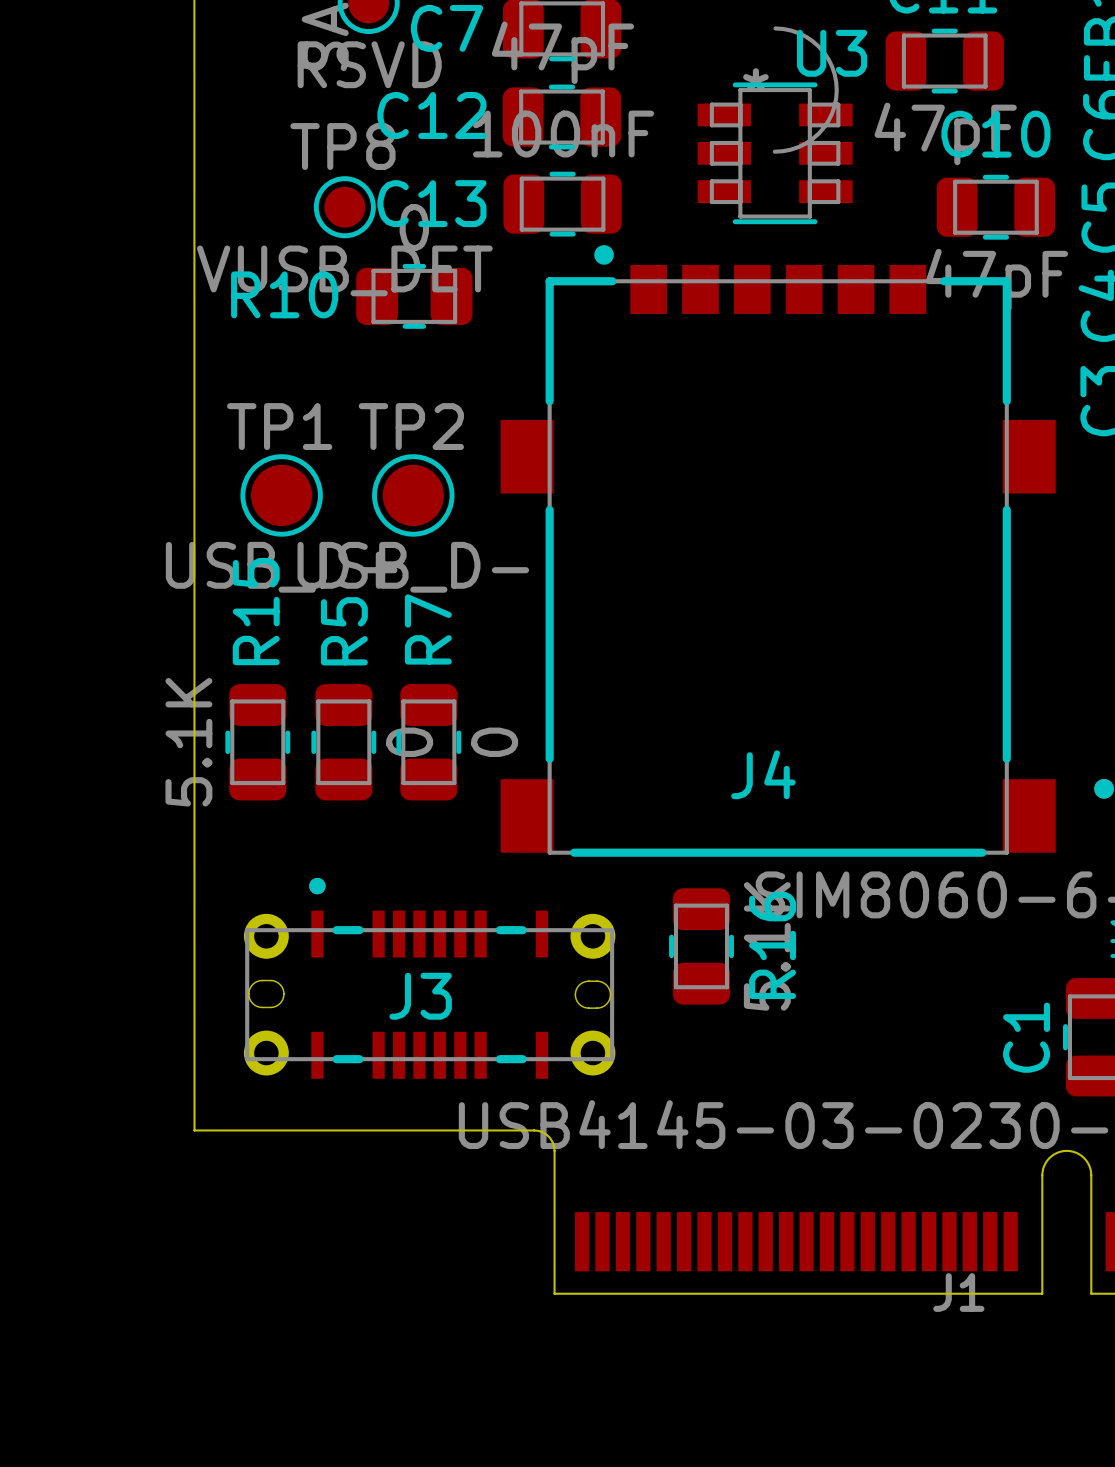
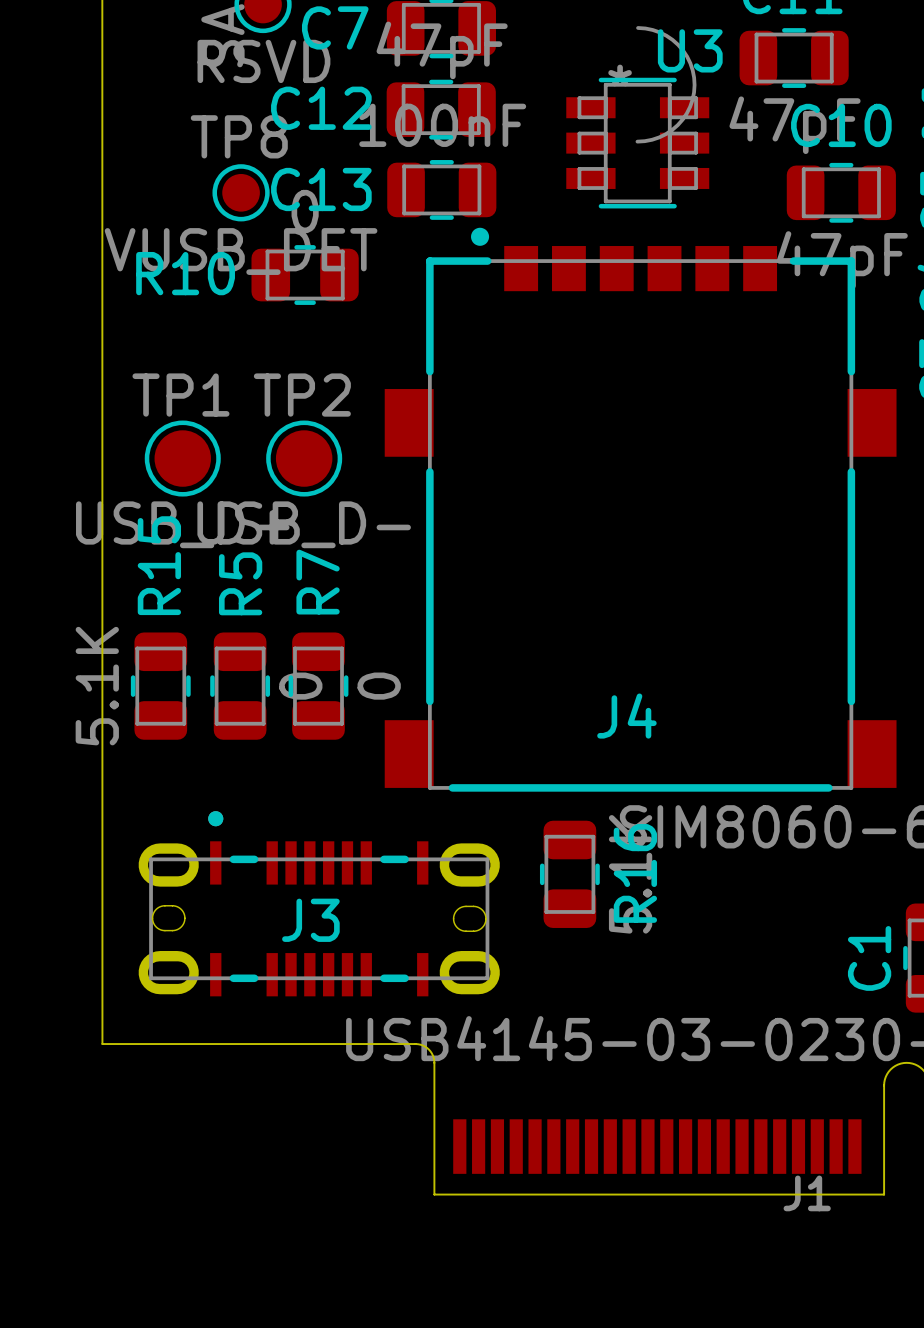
J3 footprint: [243, 877, 616, 1079] -> [138, 811, 500, 997]

